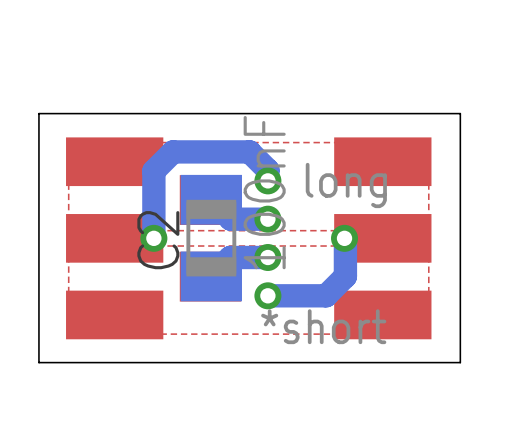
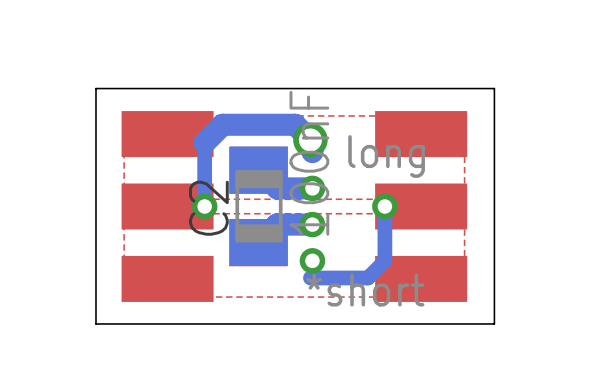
via size: [254, 167, 282, 195] -> [293, 122, 328, 158]
bottom track width: thick (153, 171) (153, 238) -> thin (204, 142) (204, 206)
bottom track: (344, 238) (345, 276) (326, 295) (267, 295) -> (384, 206) (384, 261) (367, 277) (310, 277)

